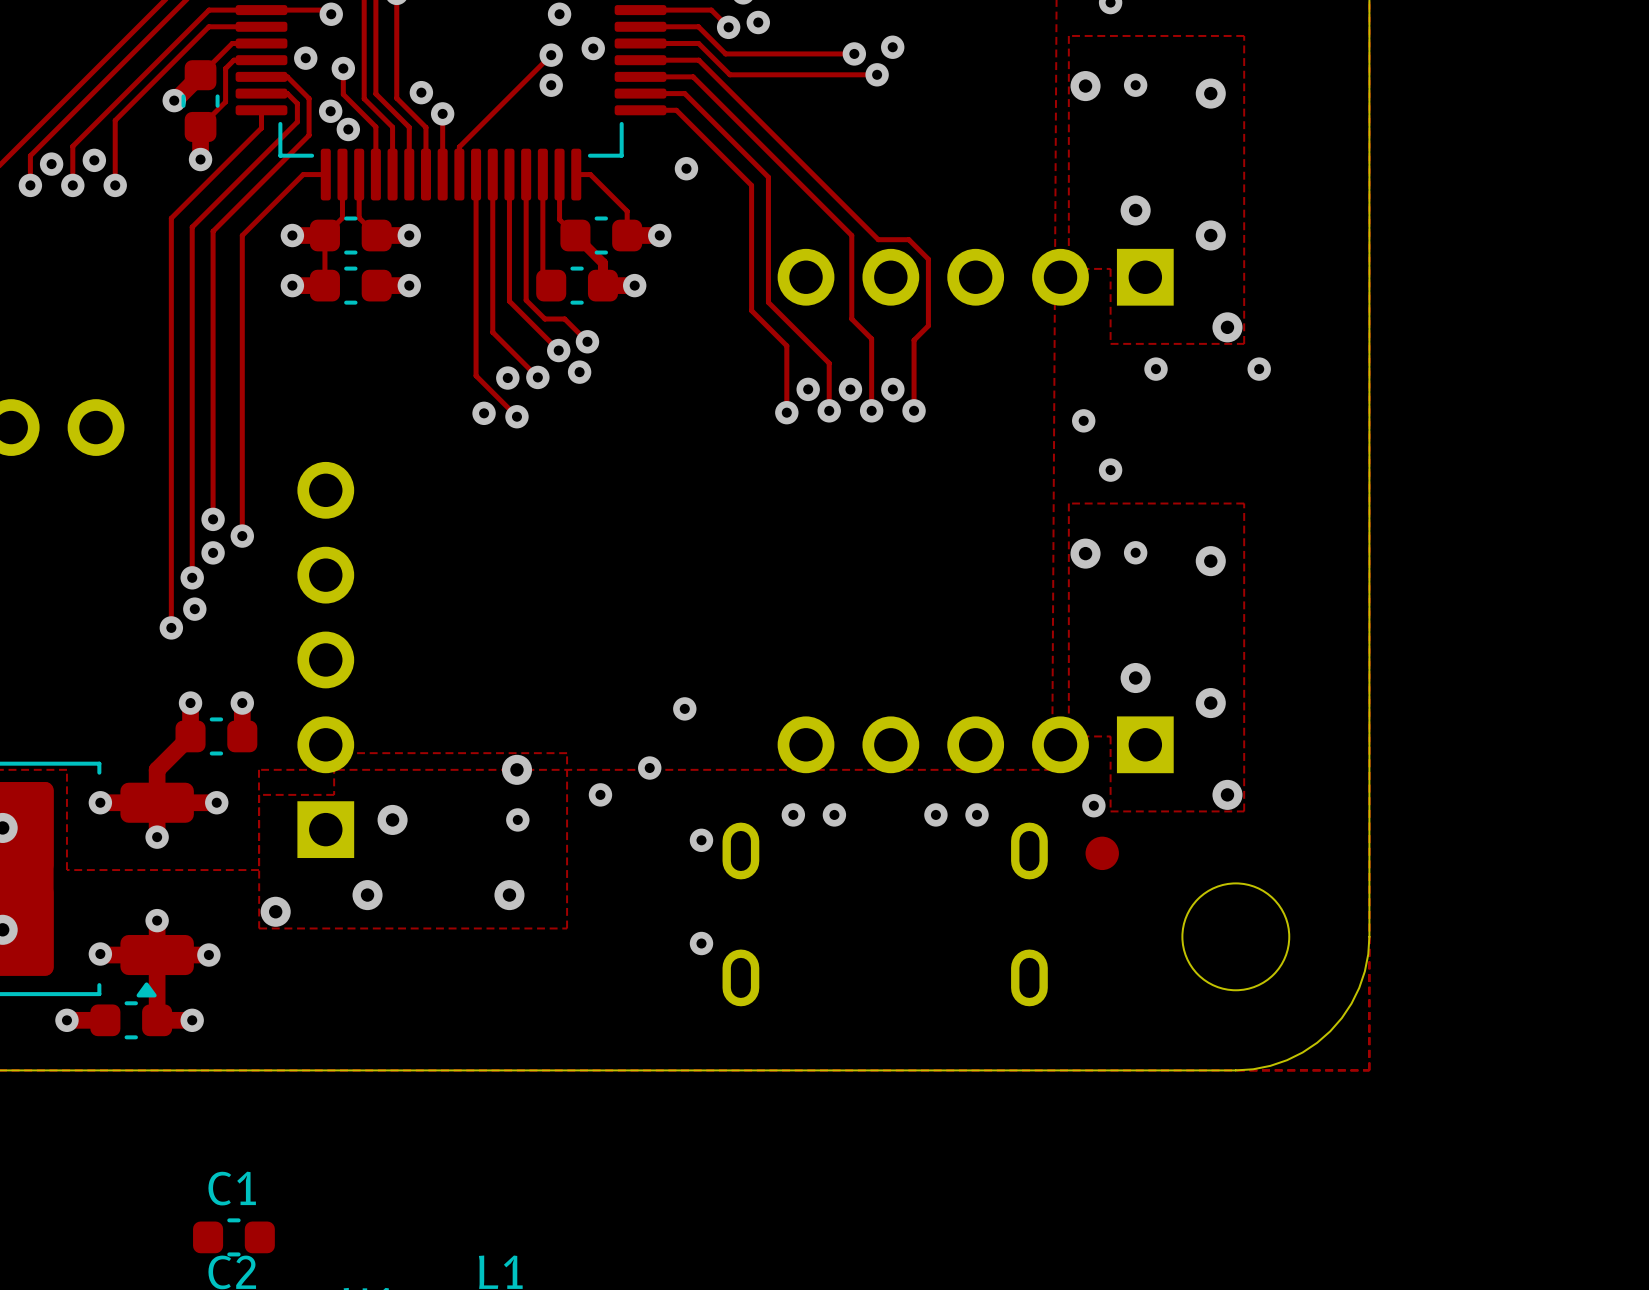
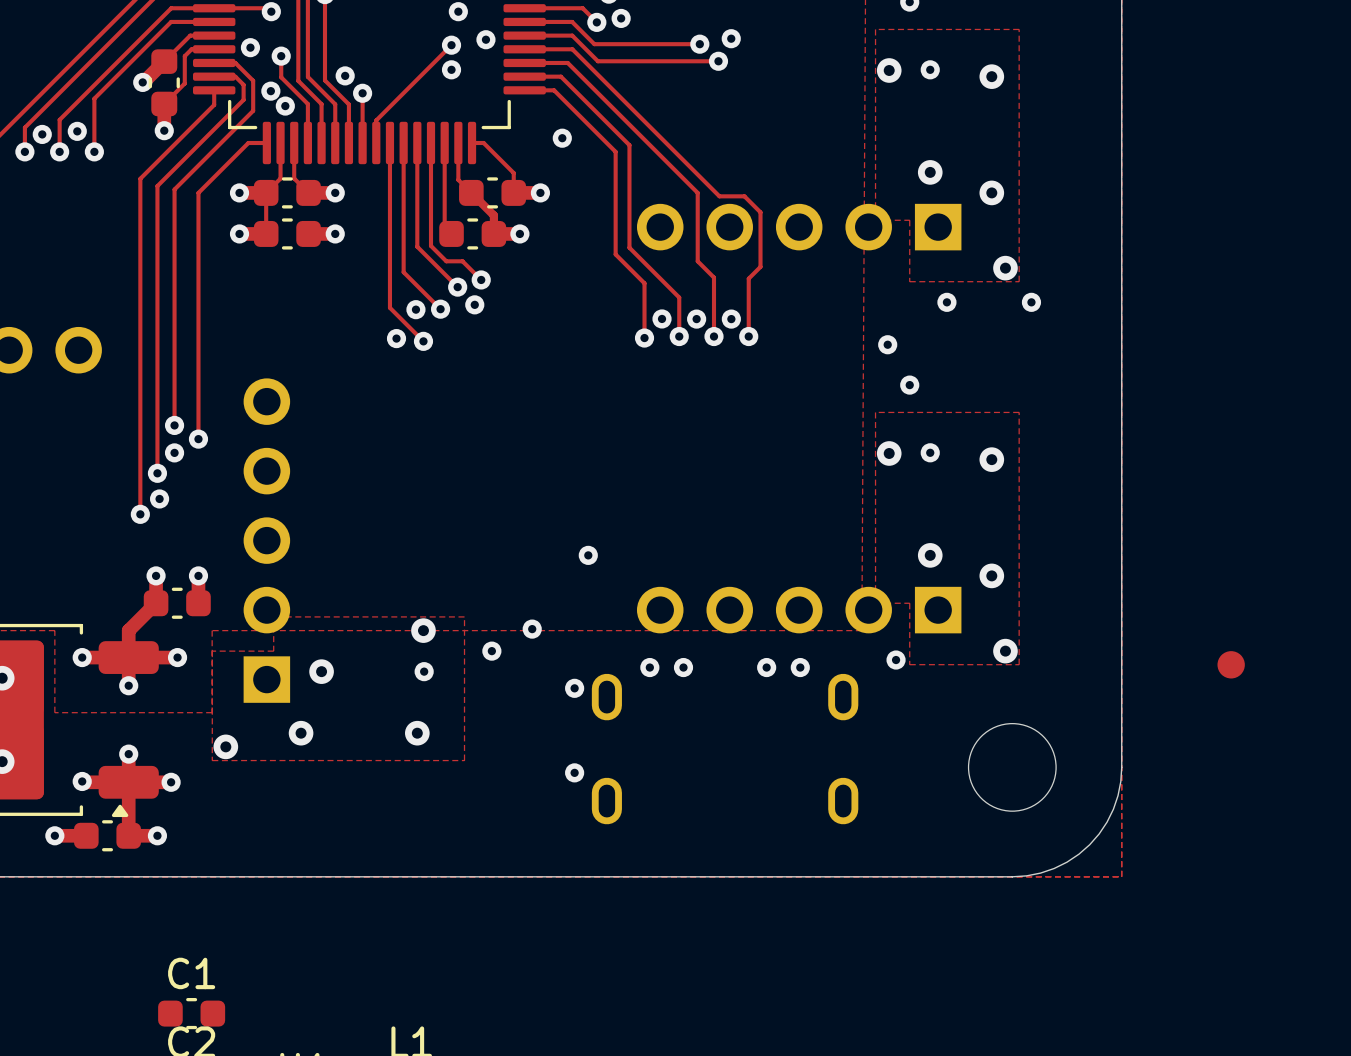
via position: (684, 708) -> (588, 555)
part position: (1102, 853) -> (1231, 664)

